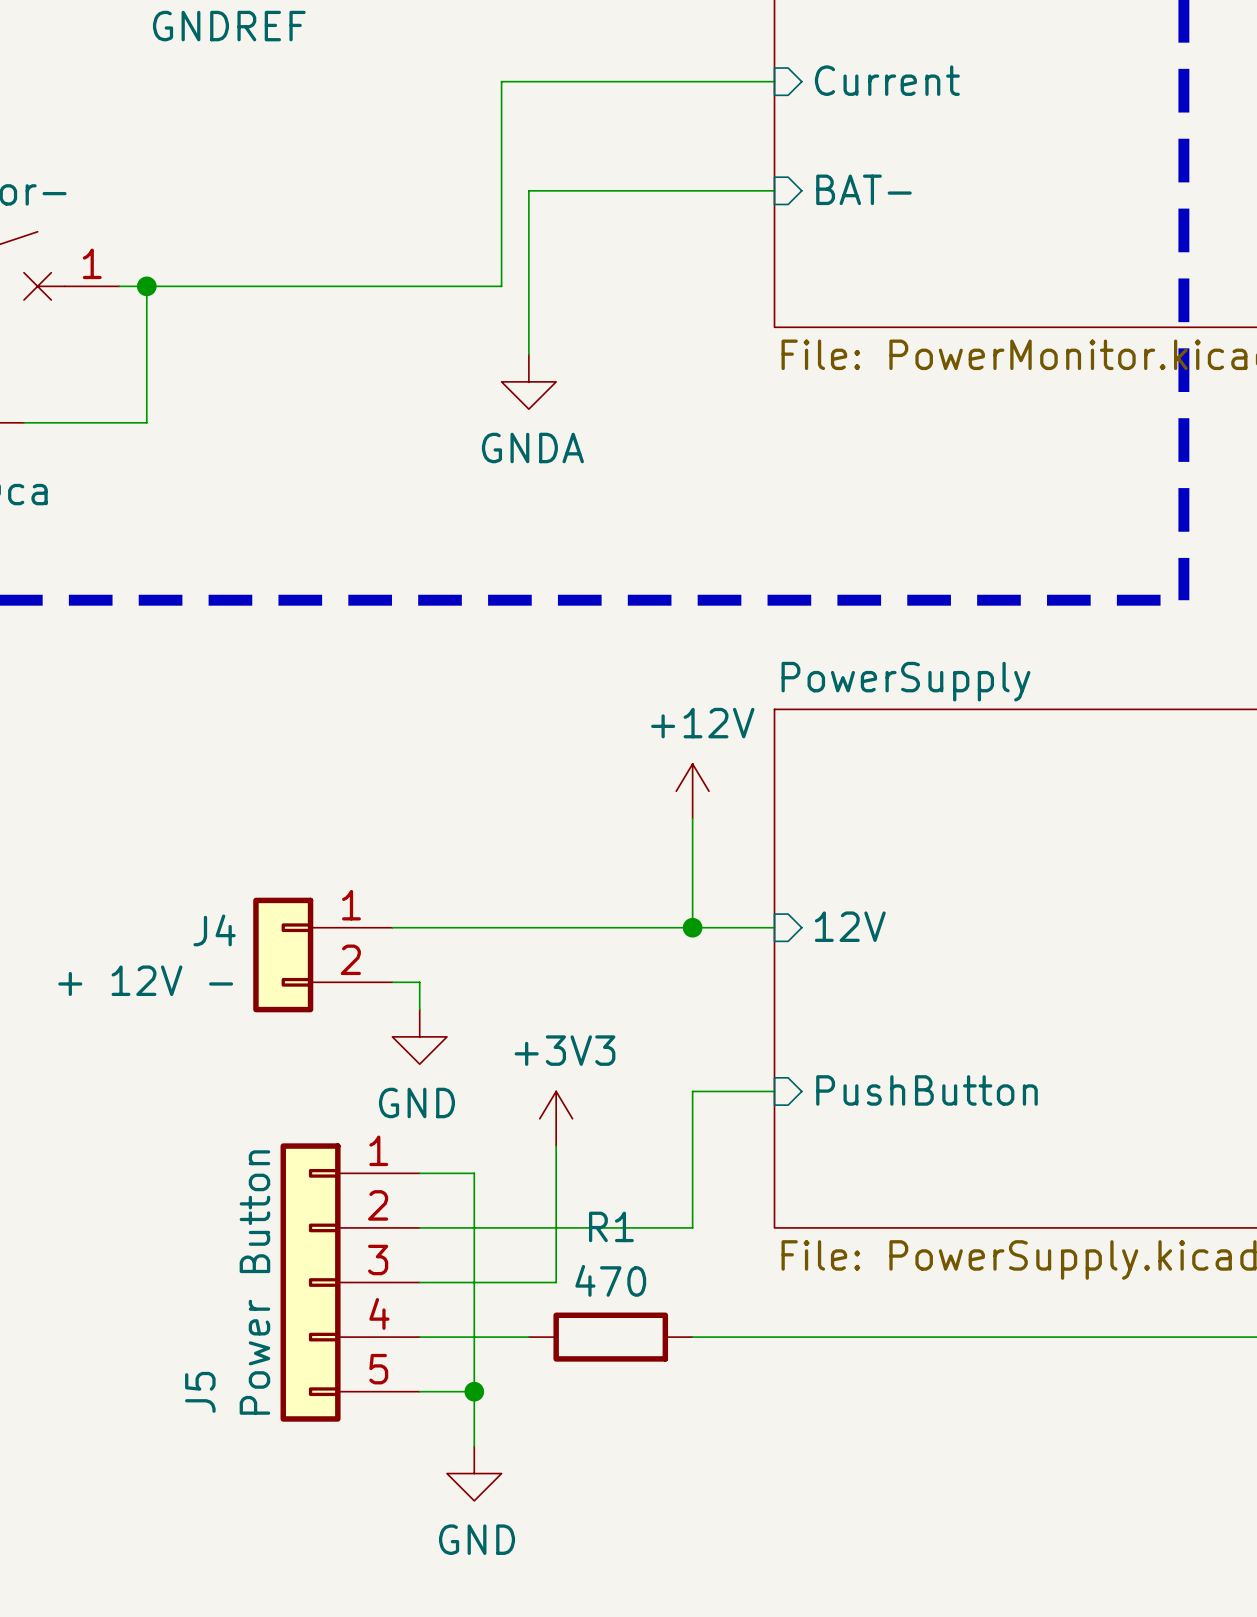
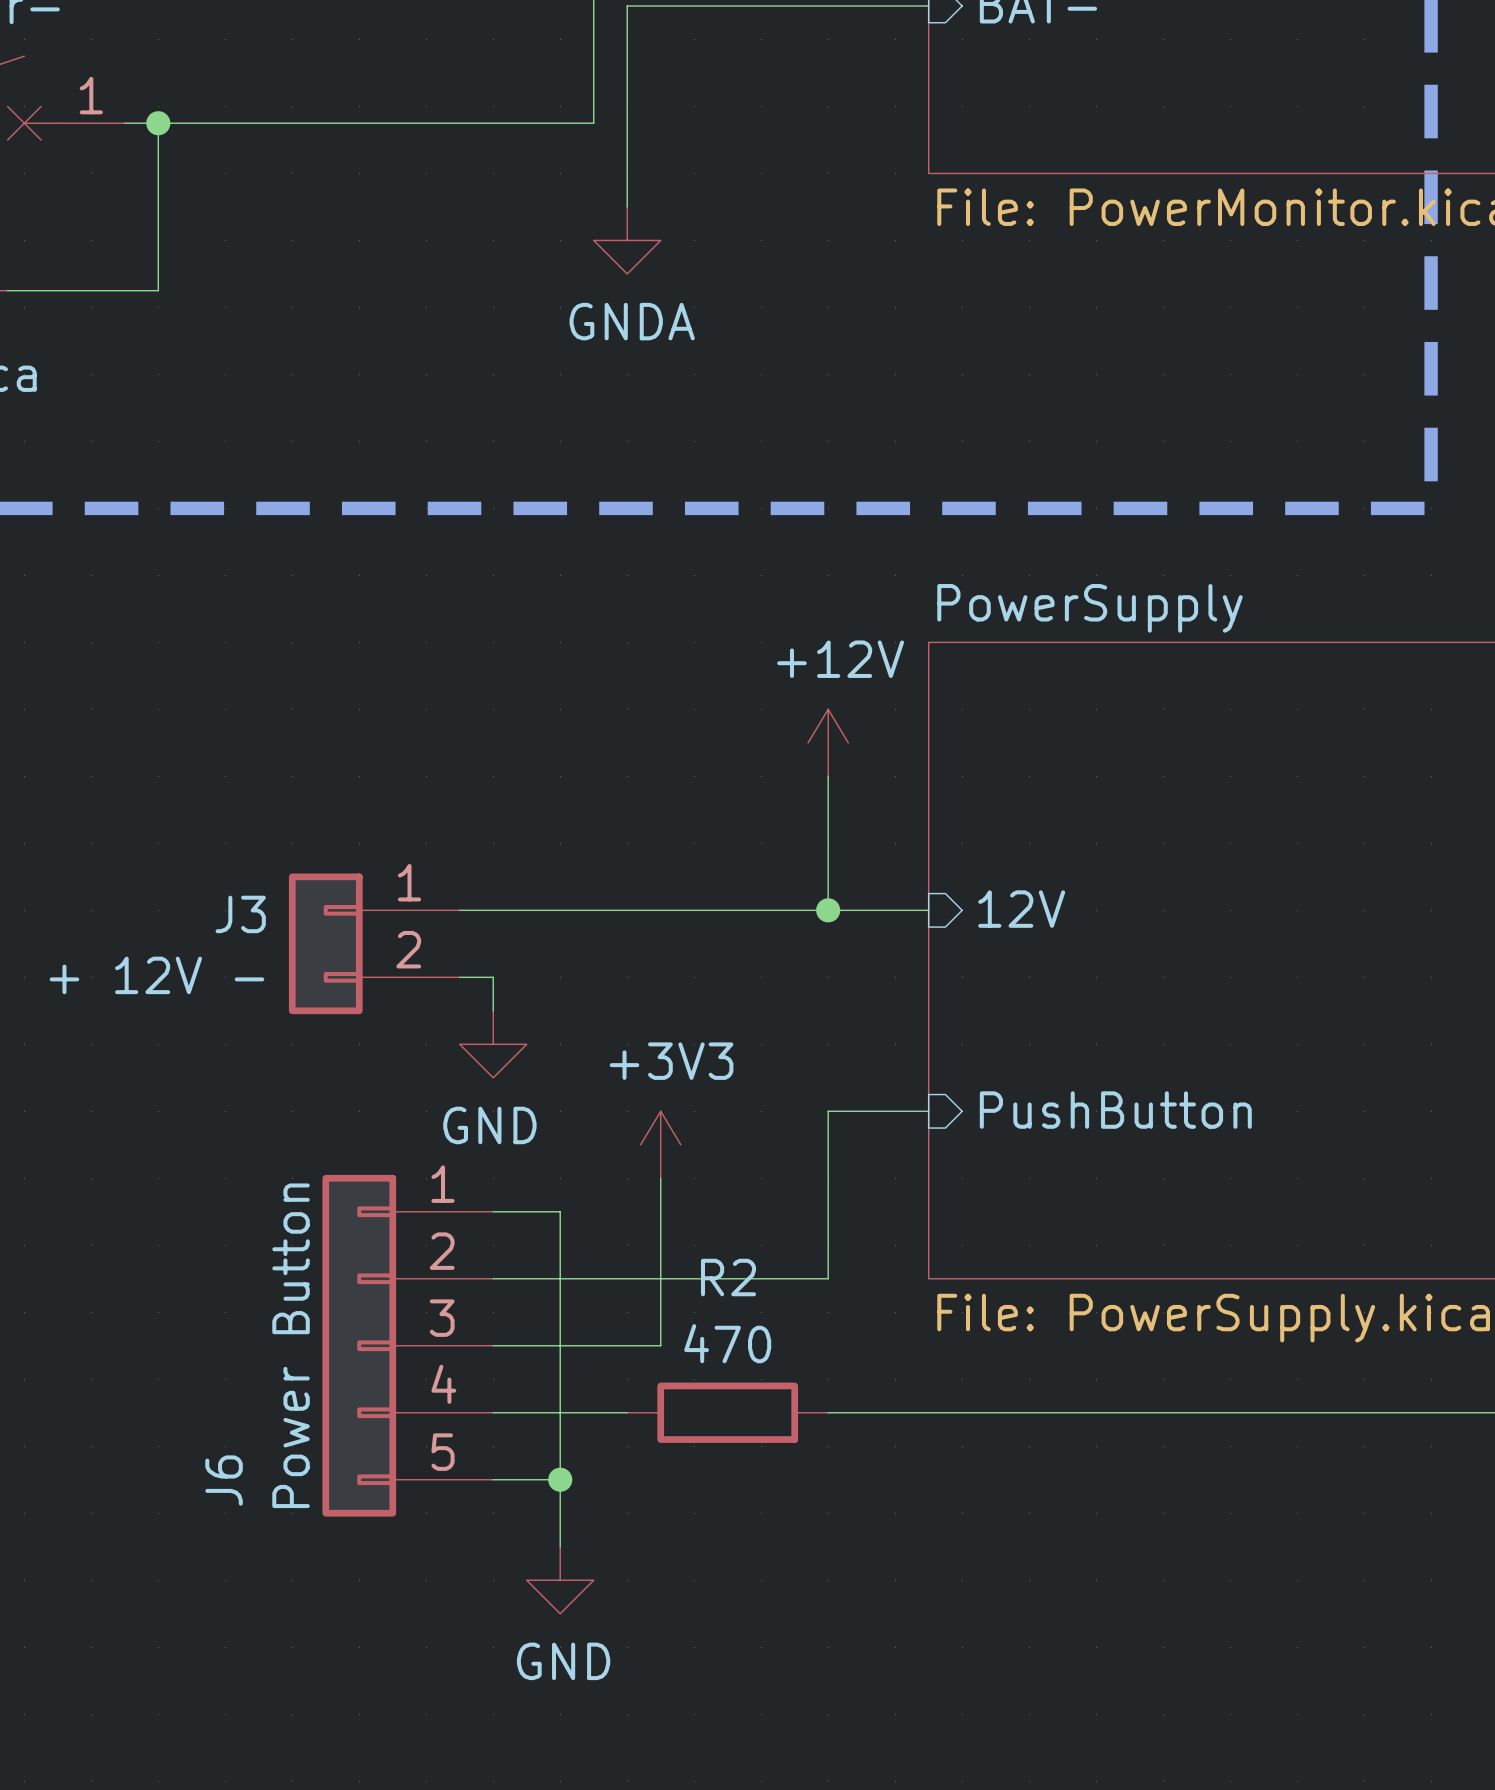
J4 name: J4 (214, 930) -> J3 (240, 914)
R1 name: R1 (611, 1226) -> R2 (728, 1277)
J5 name: J5 (200, 1392) -> J6 (224, 1480)

